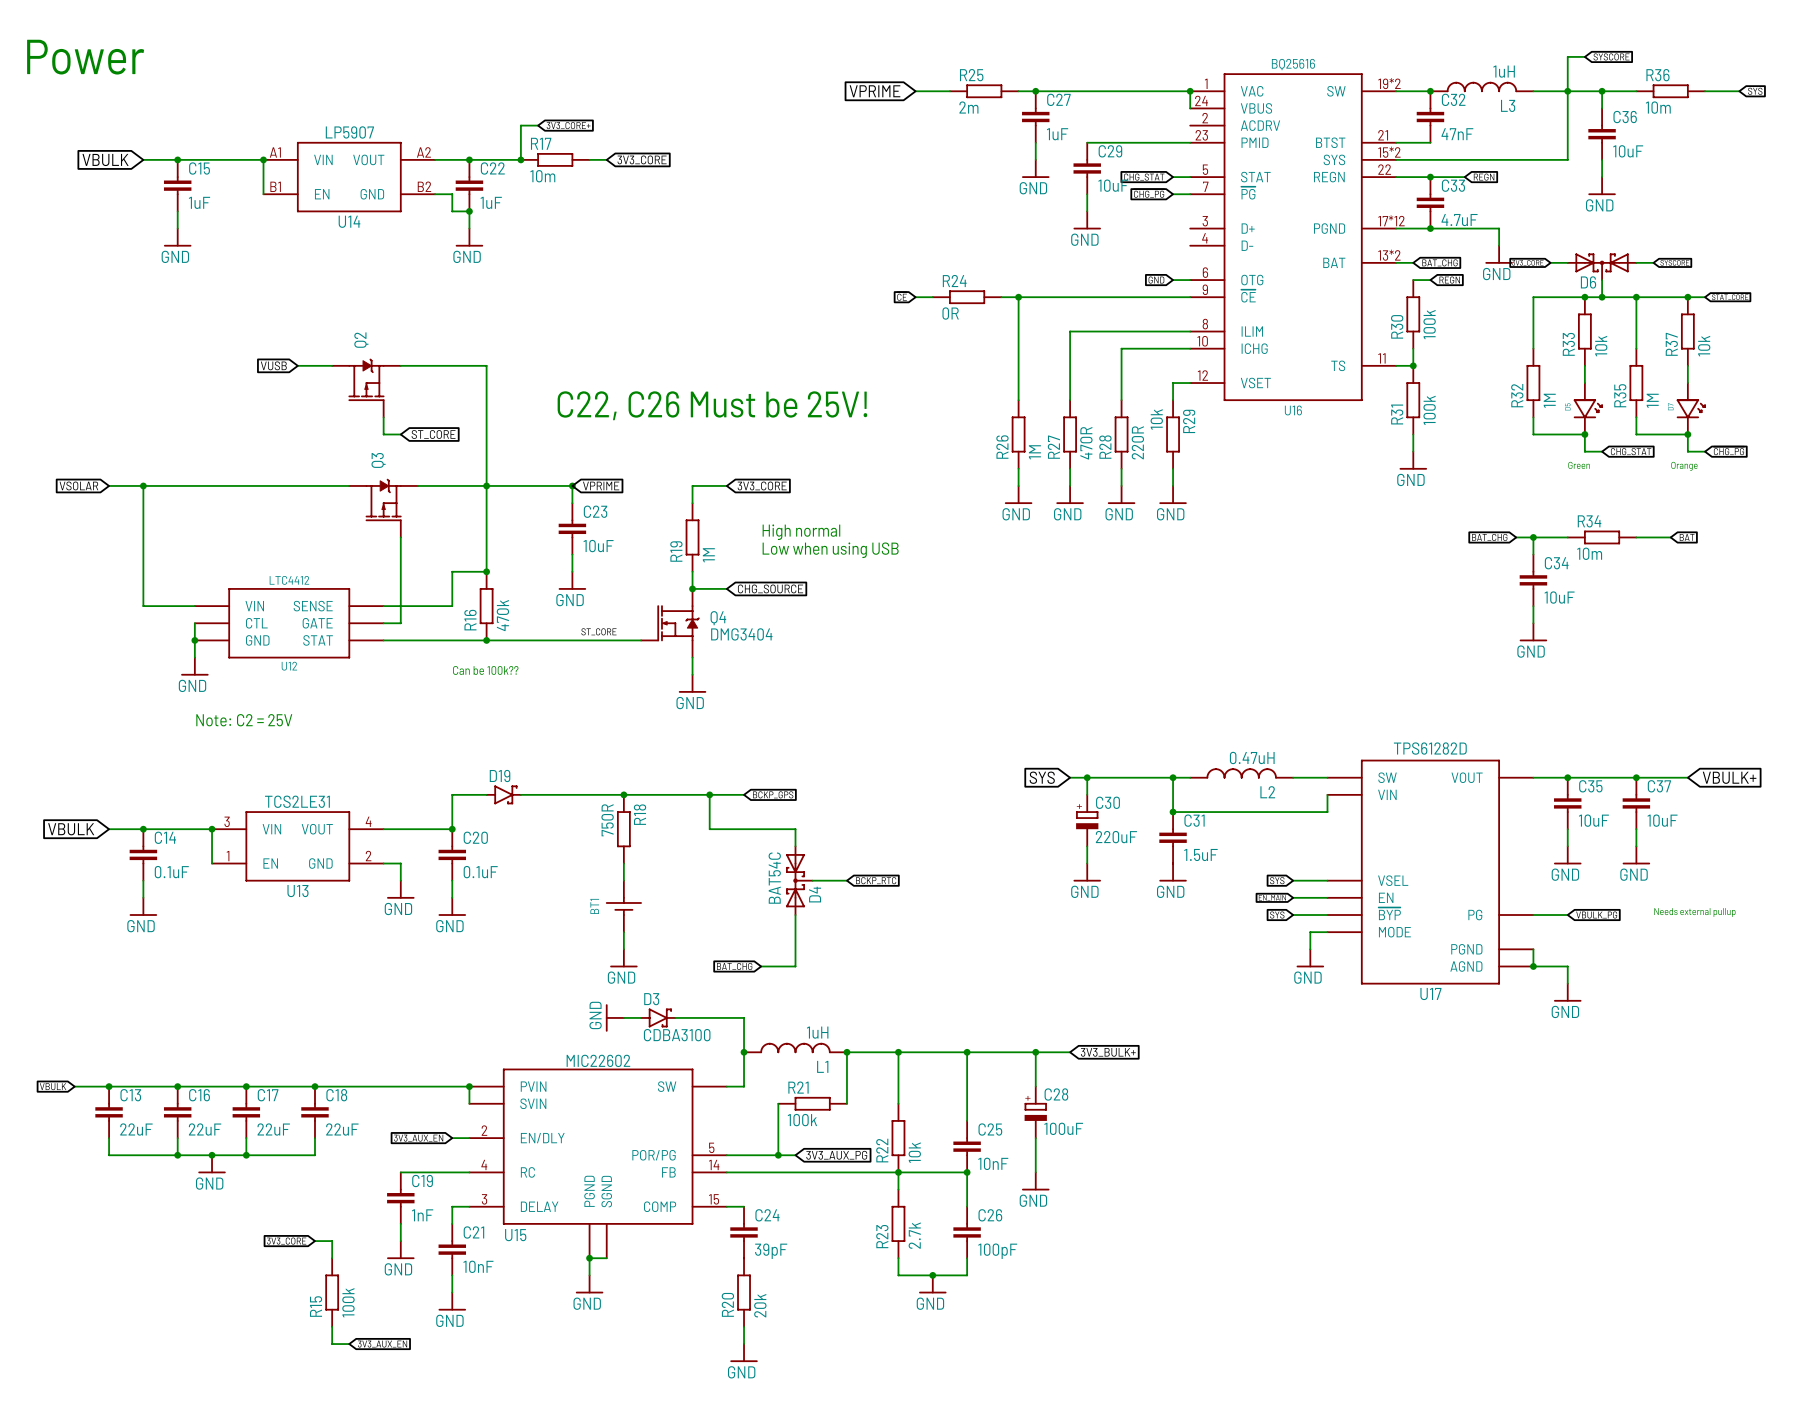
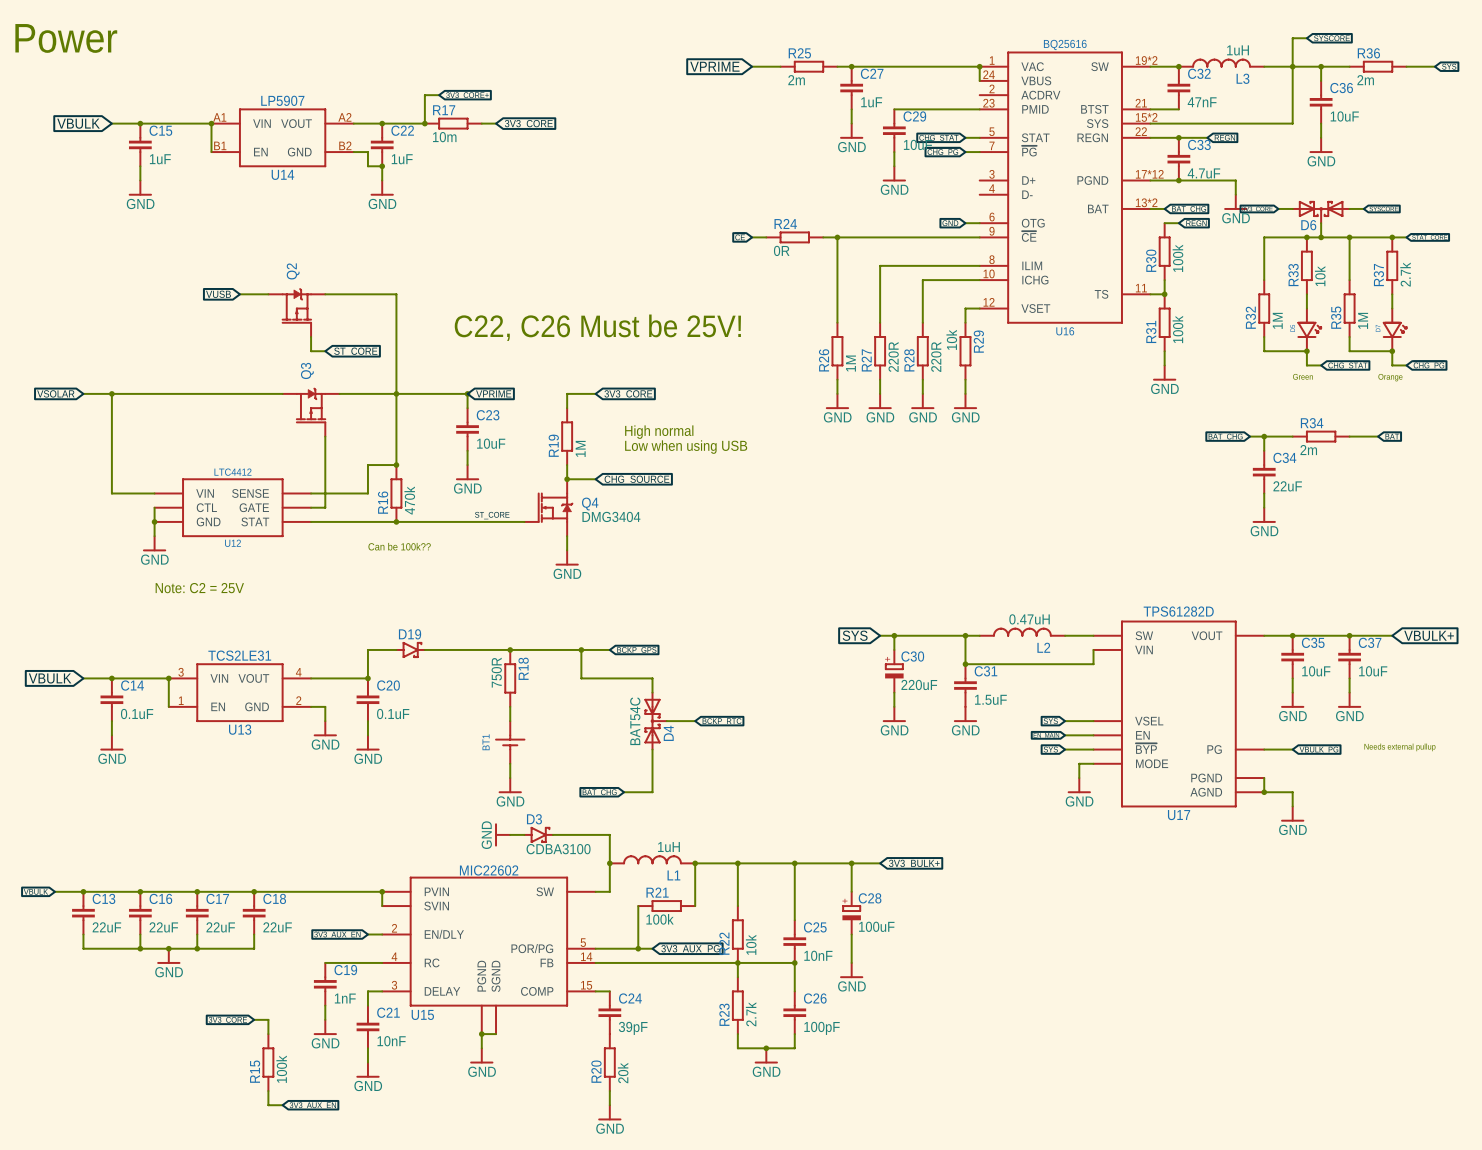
R36 value: 10m (1658, 107) -> 2m (1365, 80)
R37 value: 10k (1704, 346) -> 2.7k (1405, 274)
R27 value: 470R (1086, 443) -> 220R (893, 356)
R34 value: 10m (1589, 553) -> 2m (1308, 450)
C34 value: 10uF (1559, 597) -> 22uF (1287, 486)

